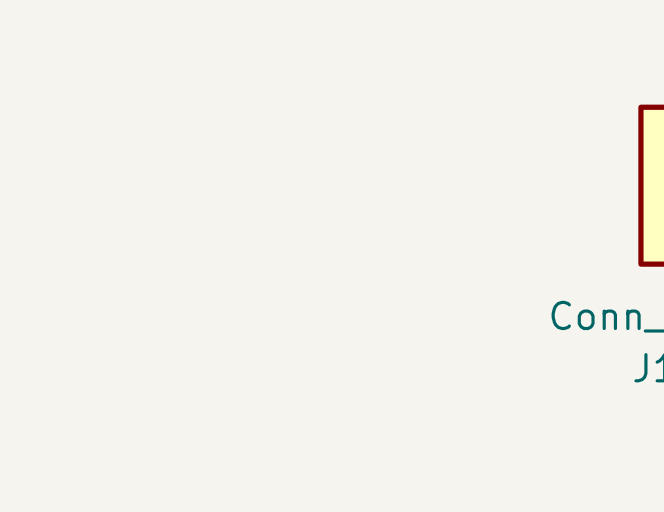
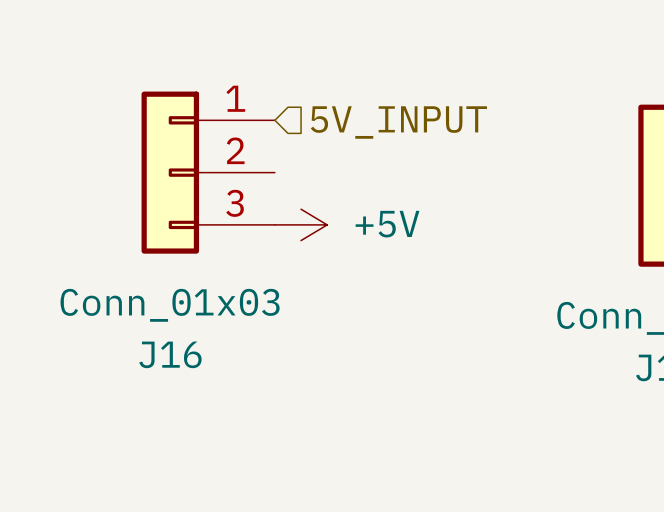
hierarchical label: none -> 5V_INPUT (398, 122)
J16: none -> Conn_01x03 (208, 172)
power symbol: none -> +5V (301, 224)

